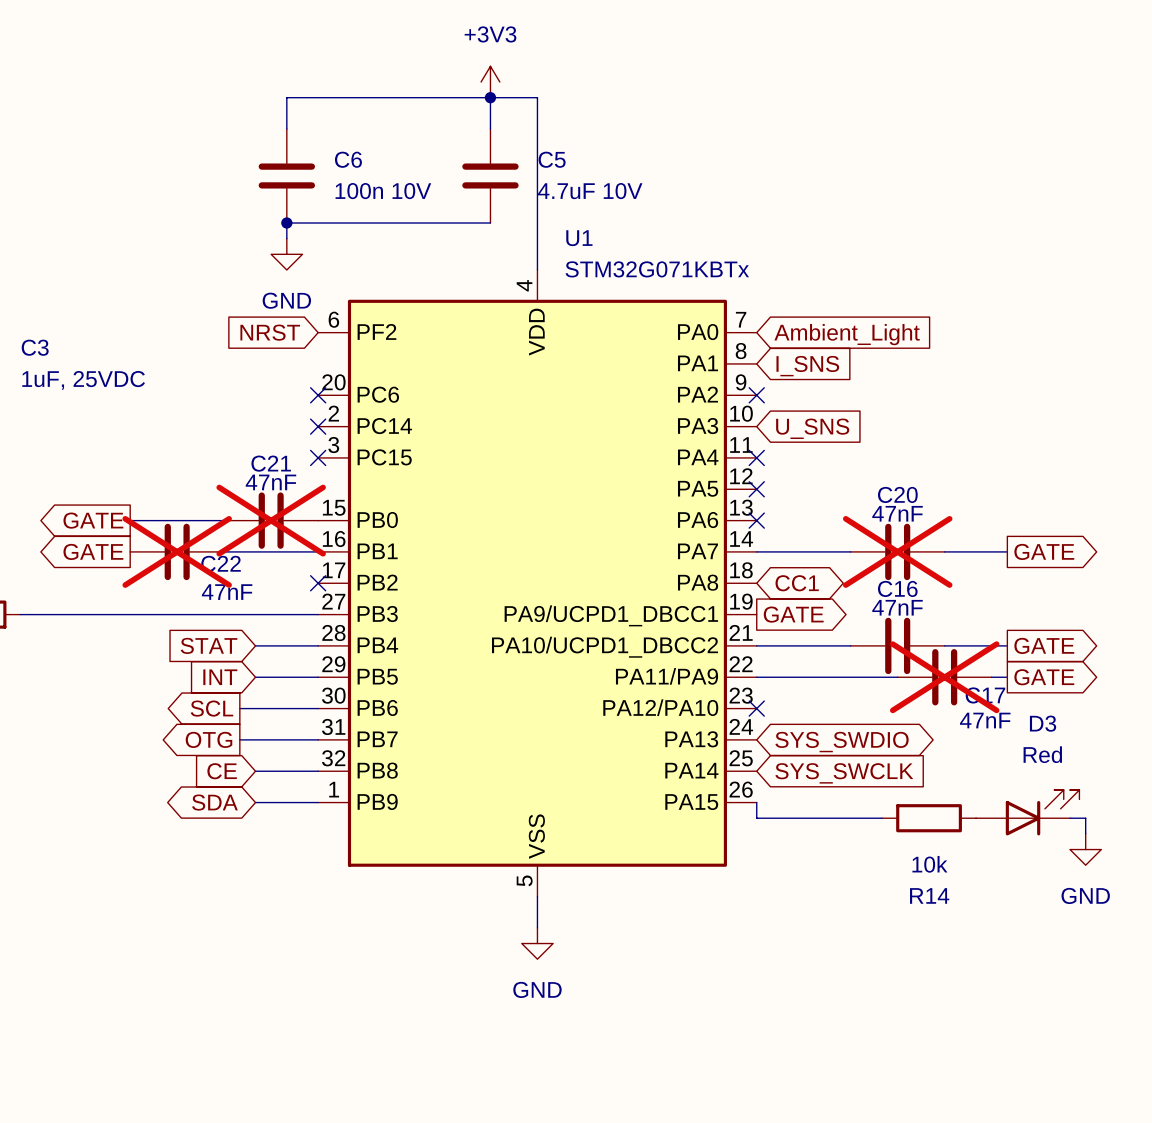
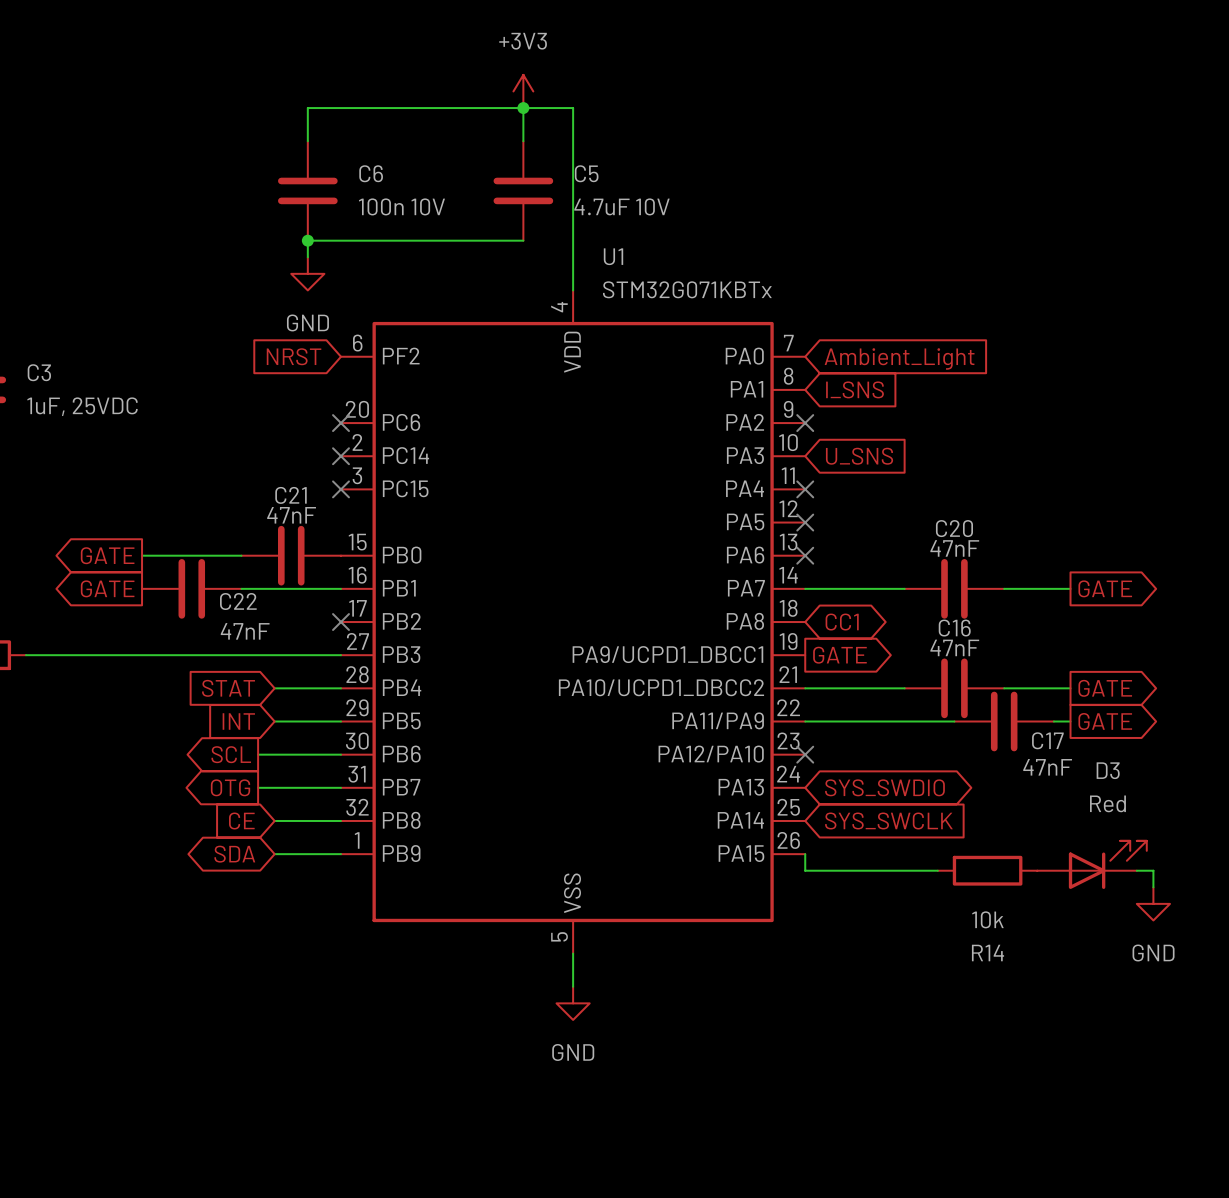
C21 do-not-place cross: (271, 520) -> none
C22 do-not-place cross: (177, 551) -> none
C20 do-not-place cross: (897, 551) -> none
C17 do-not-place cross: (944, 677) -> none

